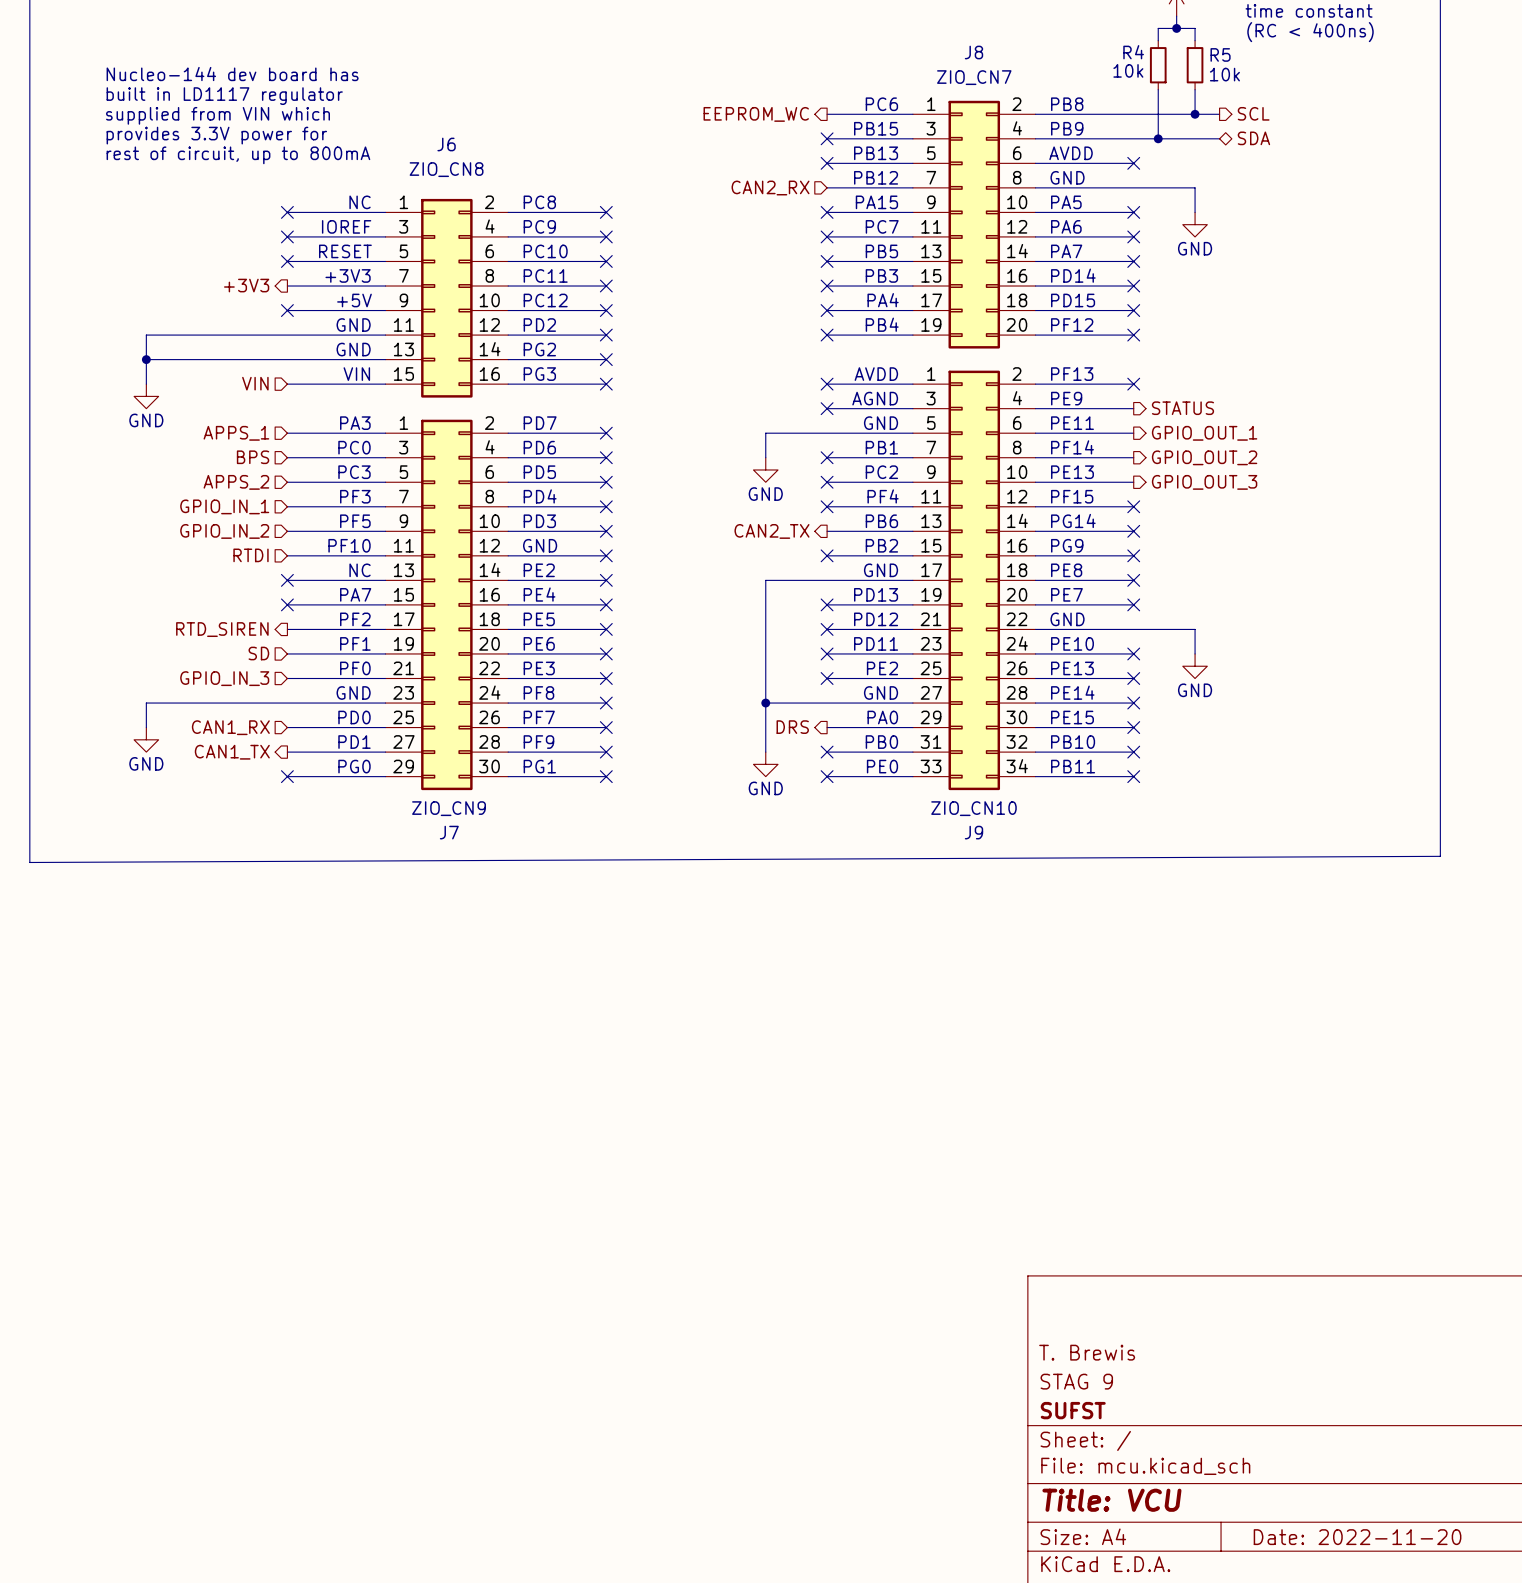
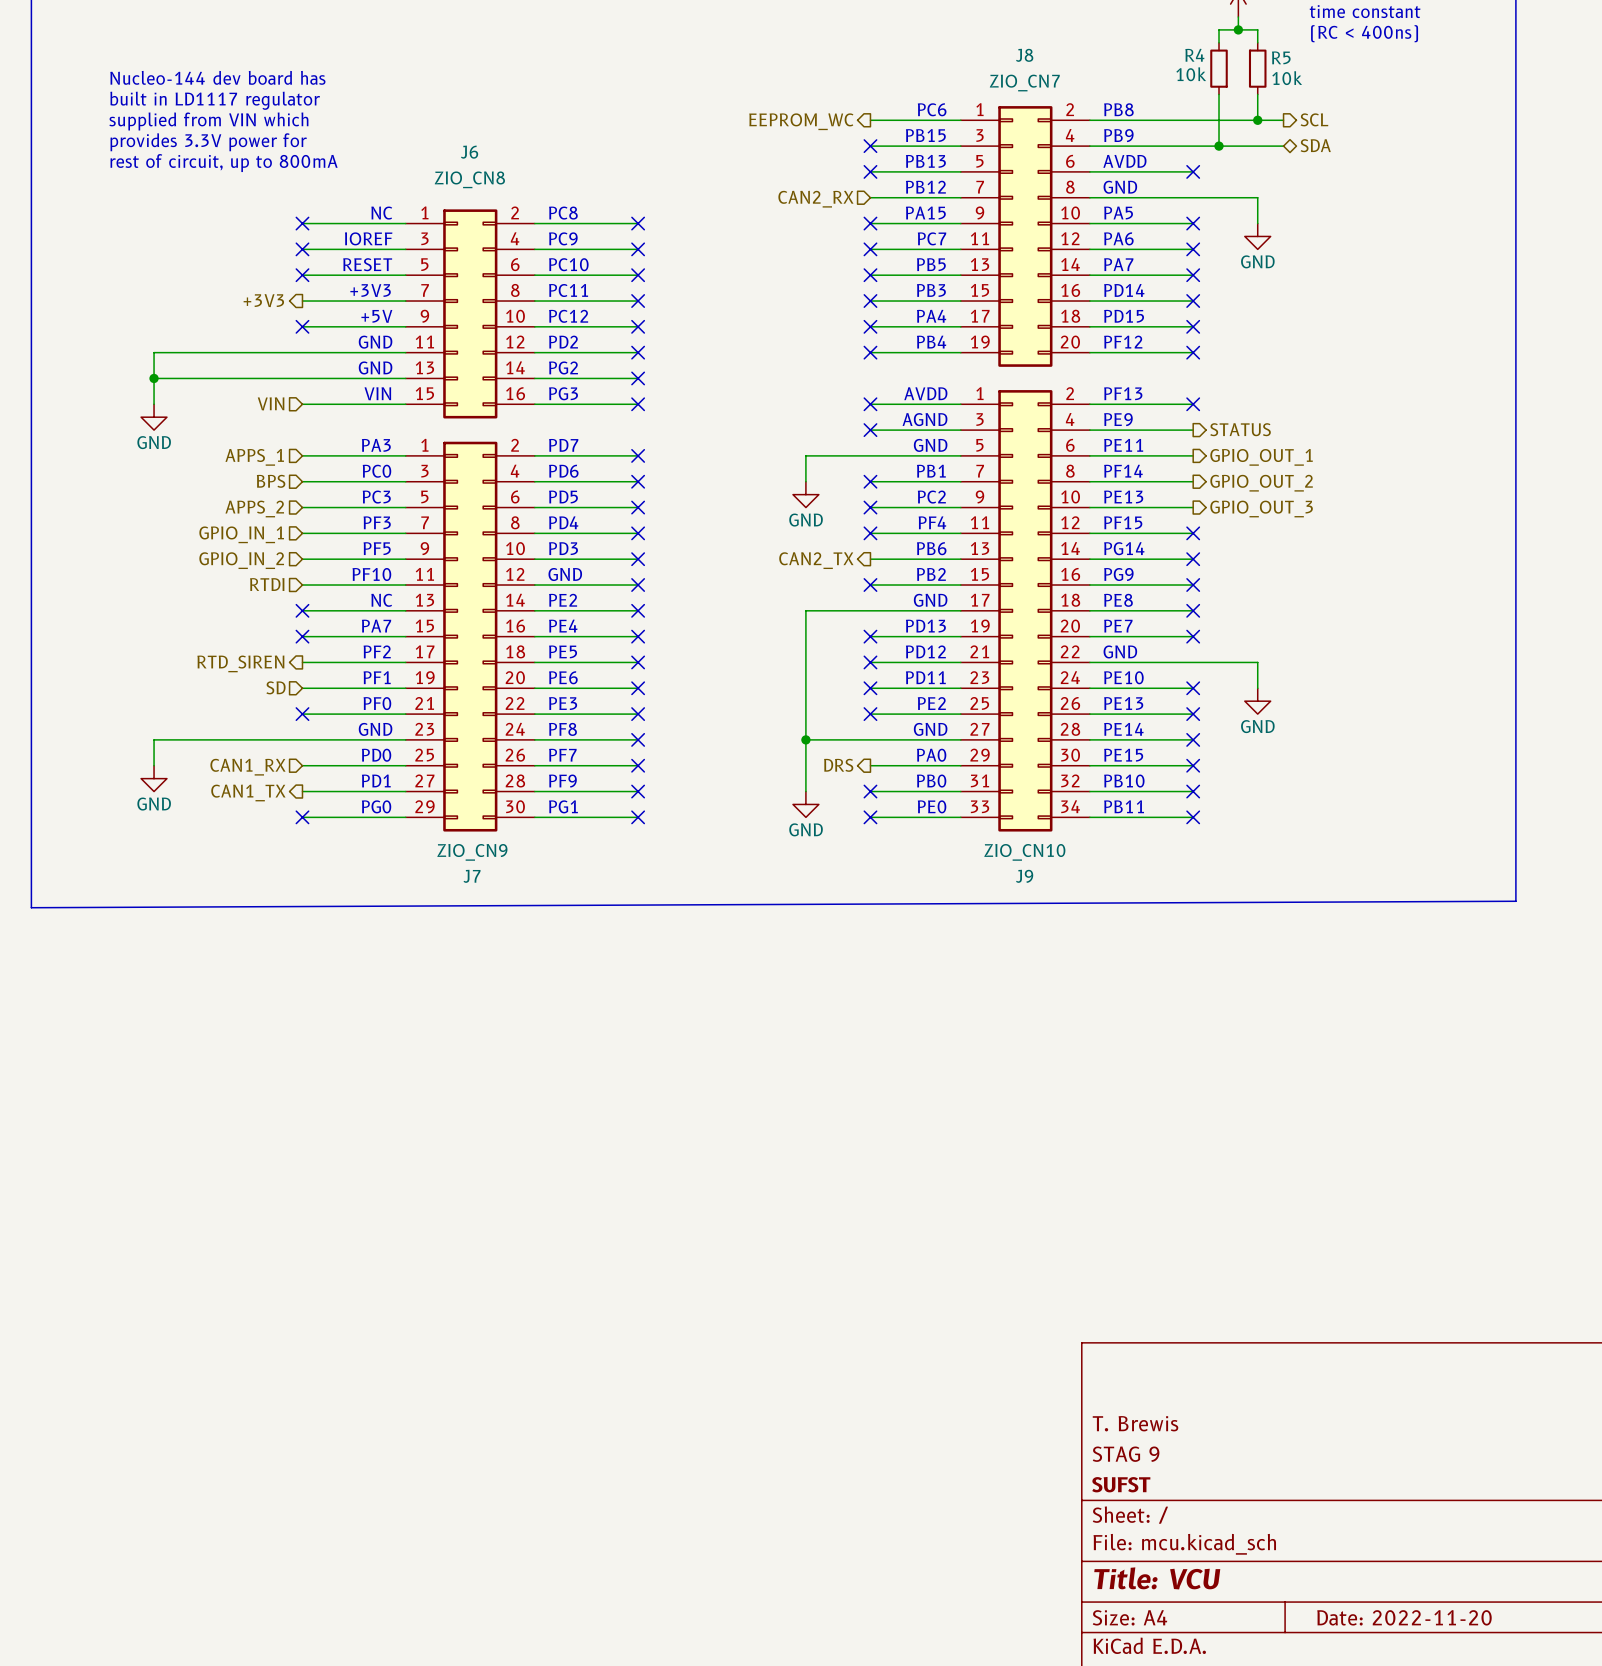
hierarchical label: GPIO_IN_3 (224, 678) -> none
no-connect mark: none -> (302, 714)

